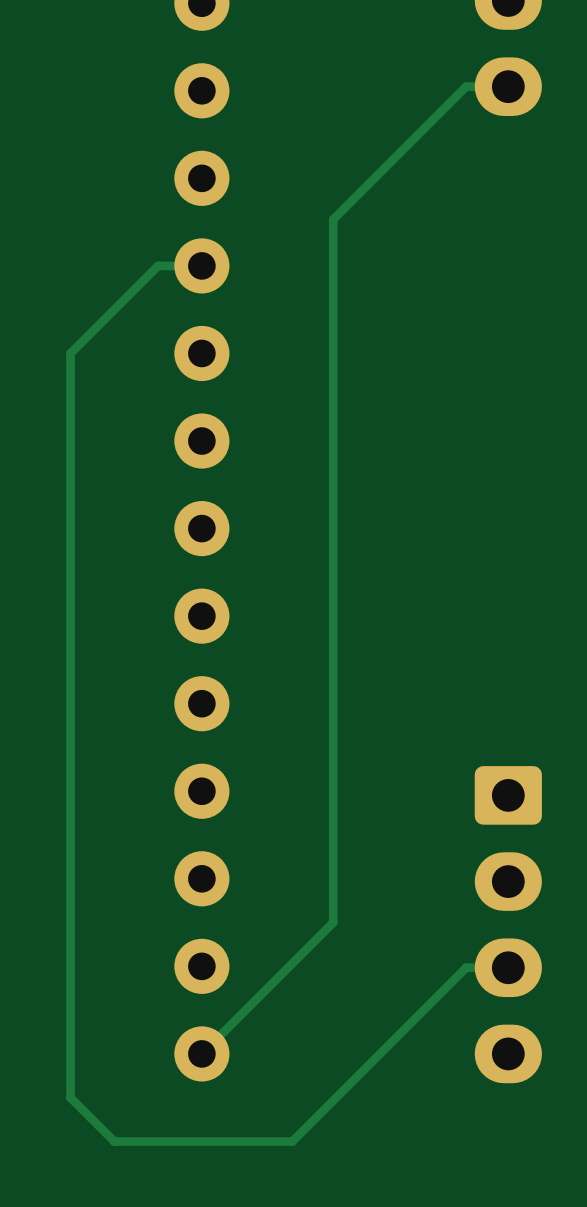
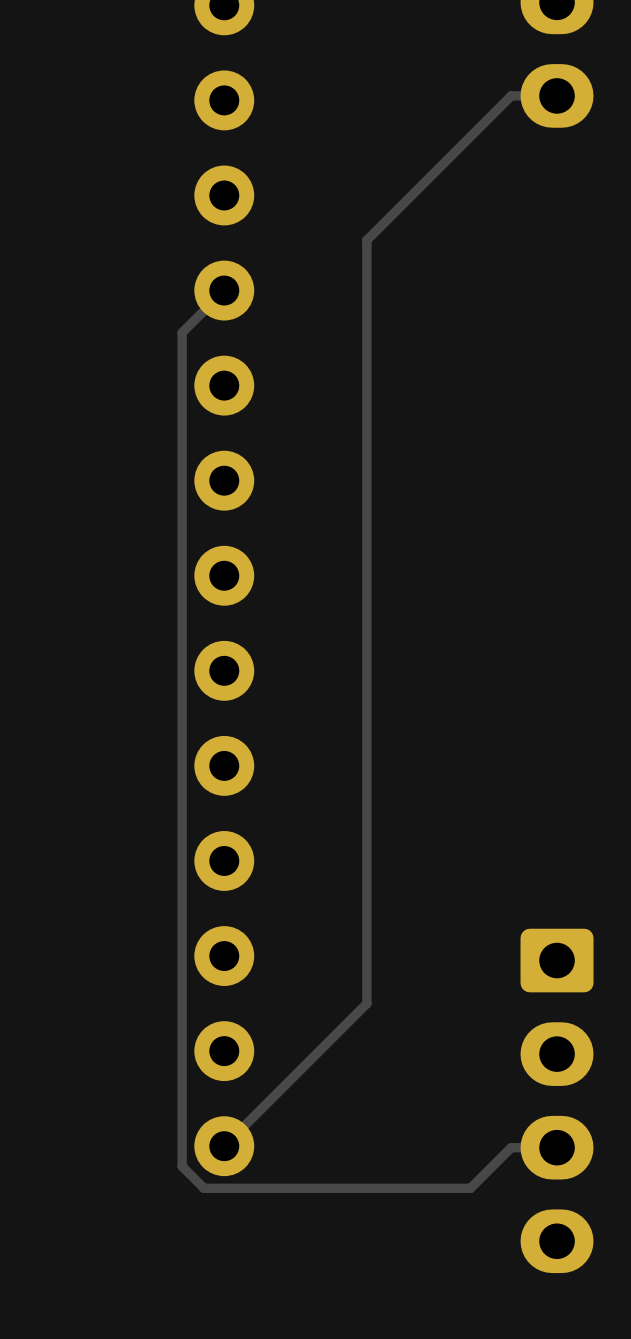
track: (201, 265) (158, 265) (70, 353) (70, 1097) (114, 1141) (292, 1141) (466, 967) (508, 967) -> (224, 290) (182, 332) (182, 1166) (204, 1188) (470, 1188) (511, 1147) (557, 1147)
part position: (508, 924) -> (557, 1100)

